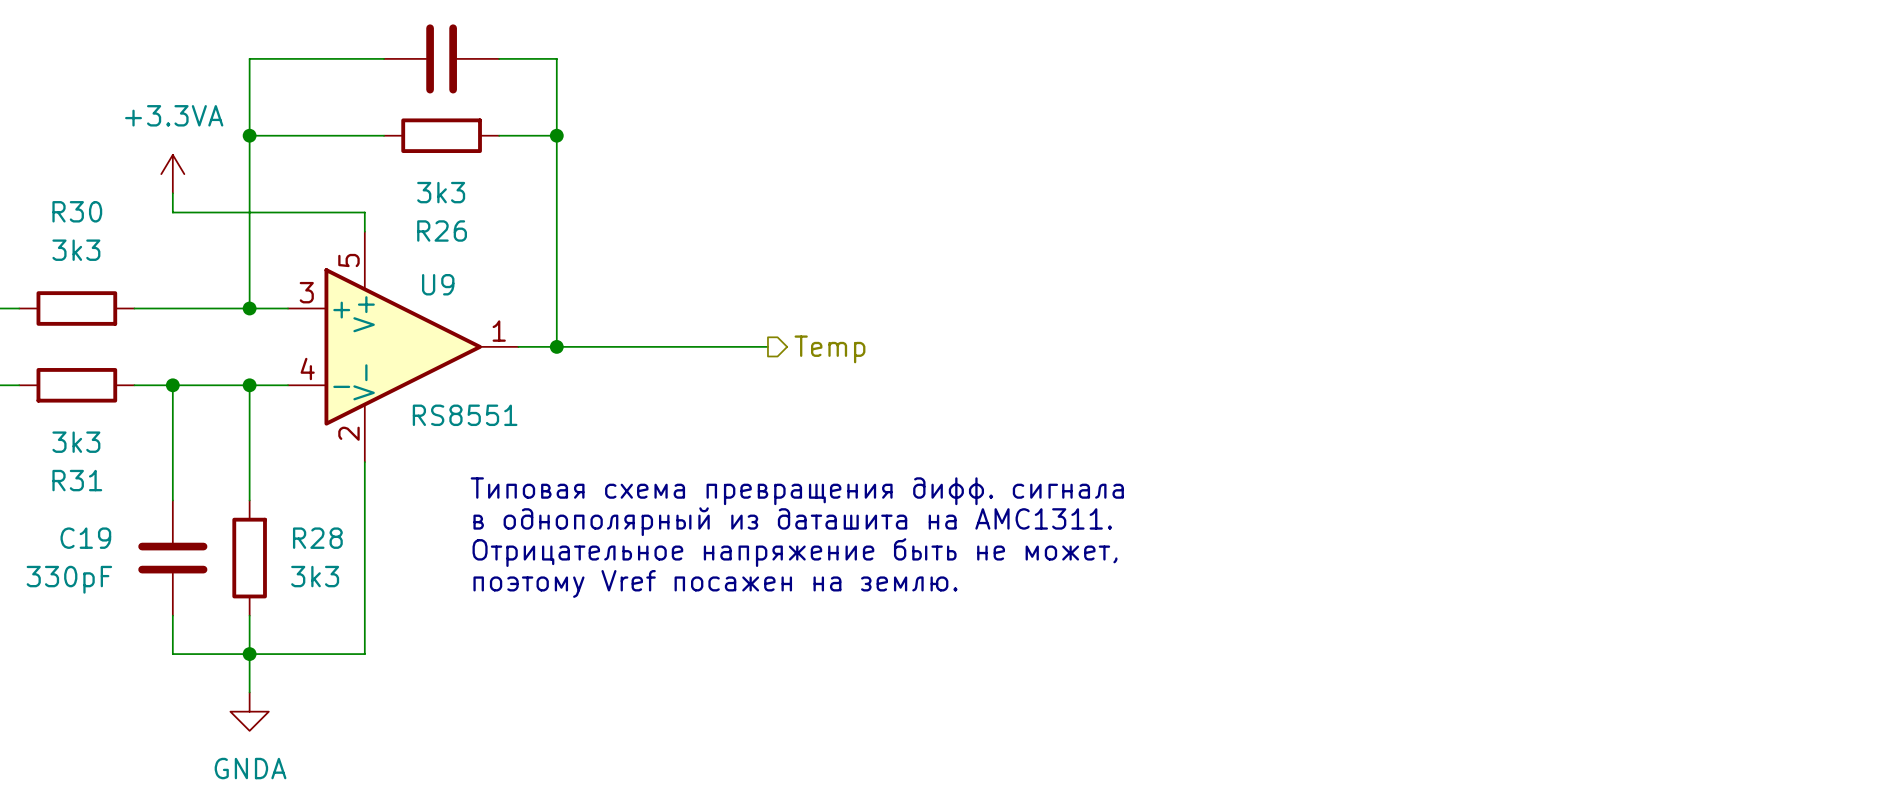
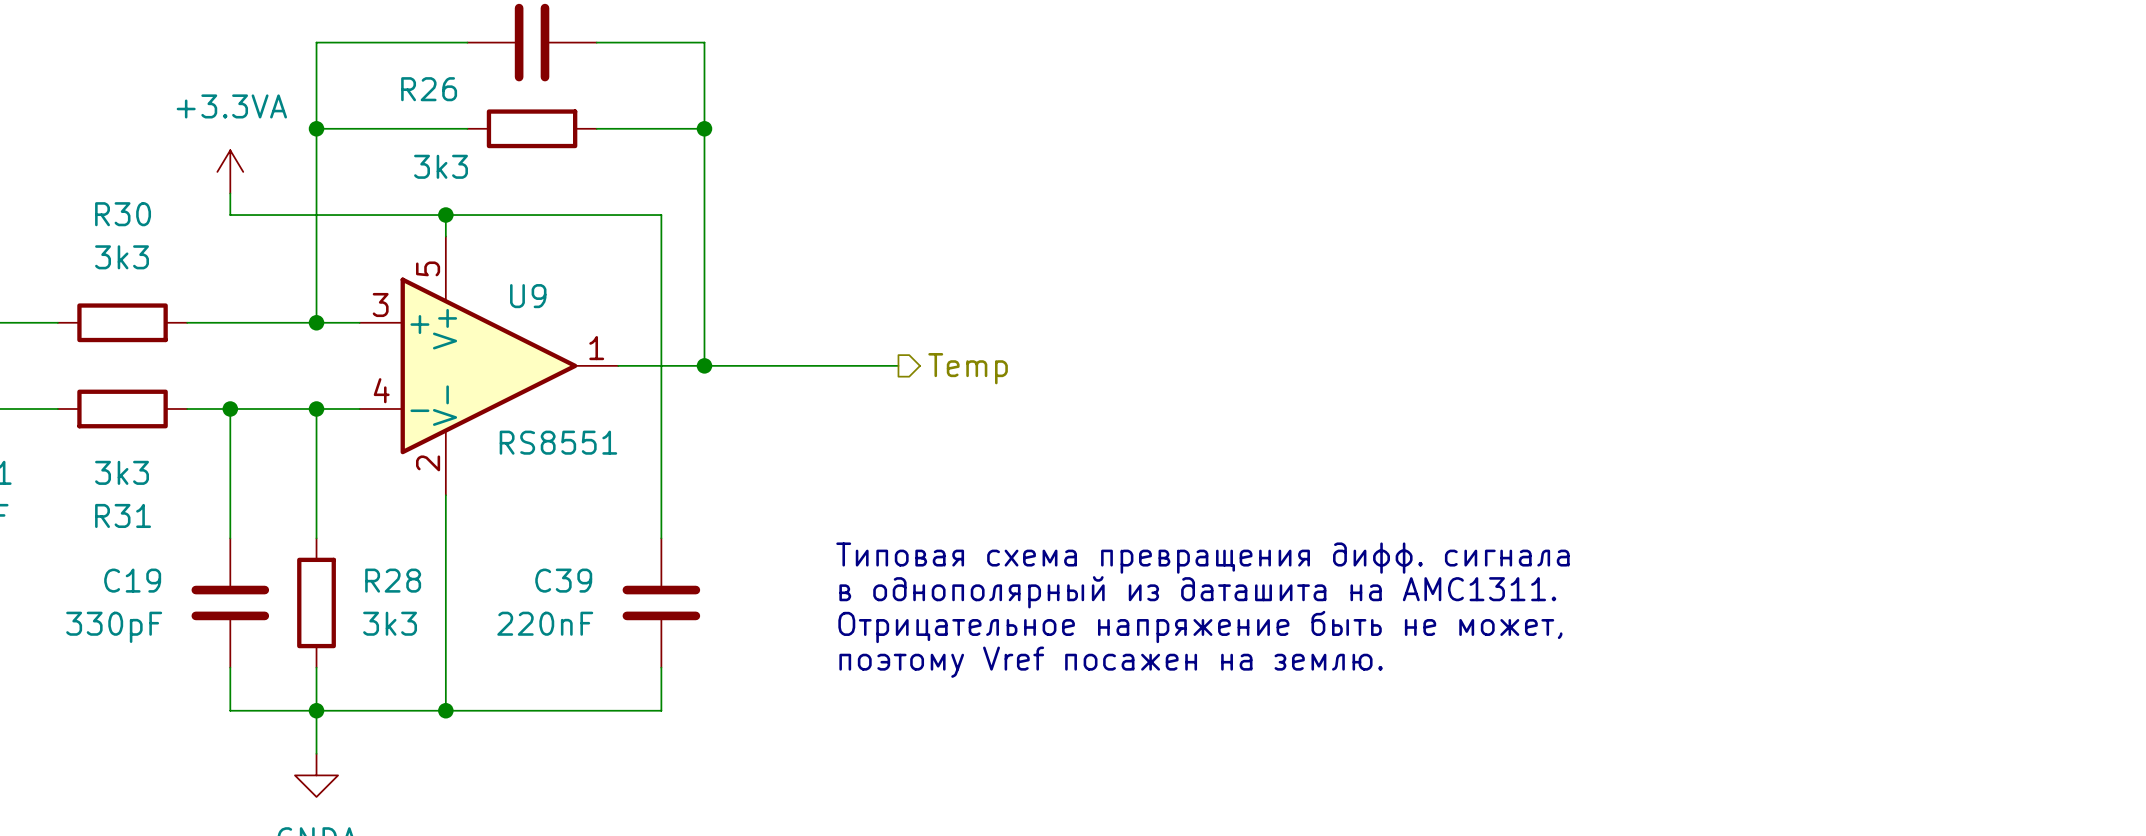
wire: (556, 58) (556, 212) -> (661, 42) (704, 42) (704, 365)
wire: none -> (661, 128) (704, 128)
junction position: (556, 135) -> (704, 128)
R26 value position: 3k3 (441, 192) -> 3k3 (441, 166)
wire: none -> (445, 215) (661, 215)
junction: none -> (445, 215)
R26 name position: R26 (442, 230) -> R26 (429, 89)
wire: none -> (661, 365) (661, 538)
junction position: (556, 346) -> (704, 365)
text position: Типовая схема превращения дифф. сигнала (797, 491) -> Типовая схема превращения дифф. сигнала (1202, 558)
text position: в однополярный из даташита на AMC1311. (792, 521) -> в однополярный из даташита на AMC1311. (1197, 592)
text position: Отрицательное напряжение быть не может, (794, 552) -> Отрицательное напряжение быть не может, (1200, 626)
C39: none -> 220nF (661, 602)
text position: поэтому Vref посажен на землю. (715, 583) -> поэтому Vref посажен на землю. (1111, 662)
wire: none -> (661, 667) (661, 710) (445, 710)
junction: none -> (445, 710)

